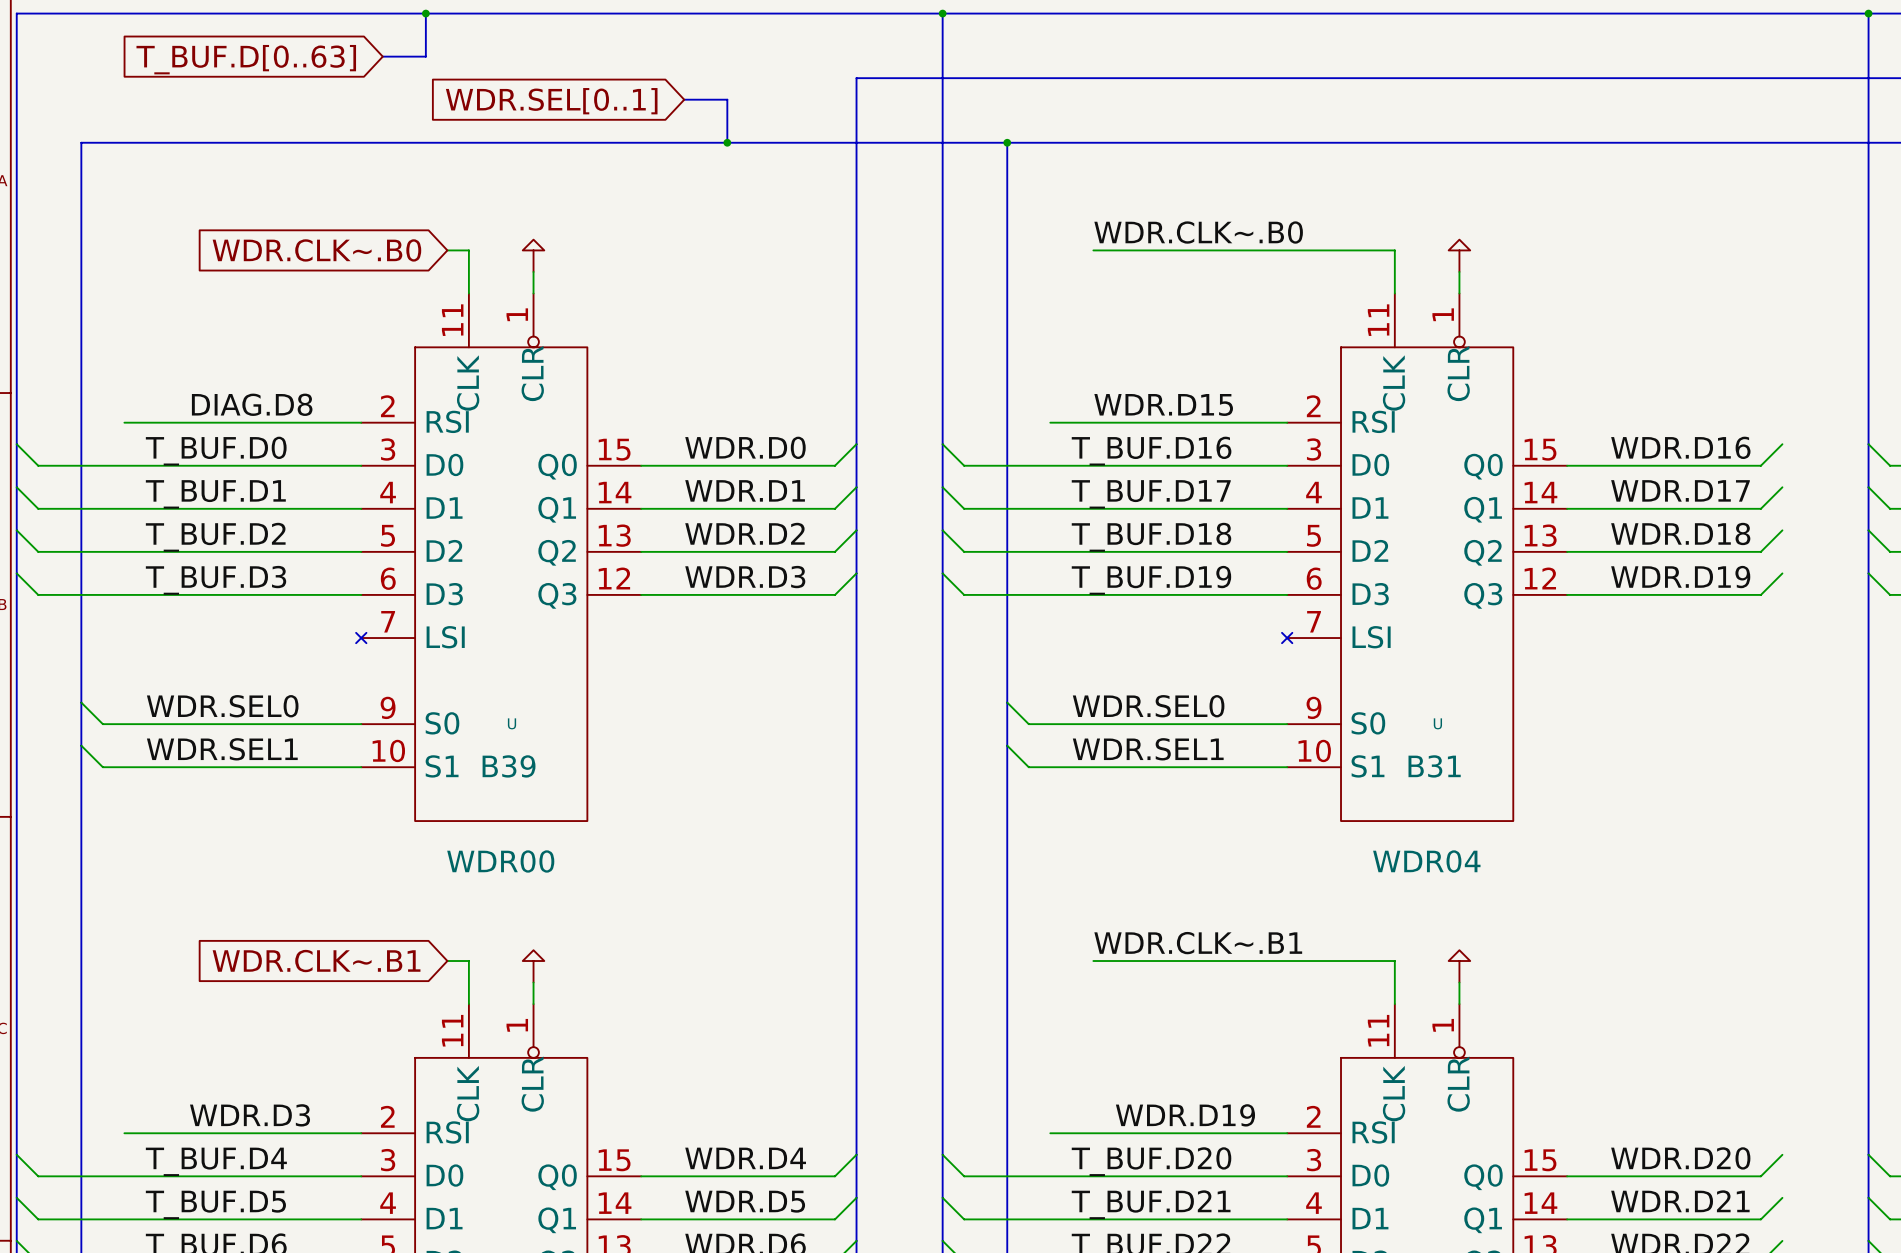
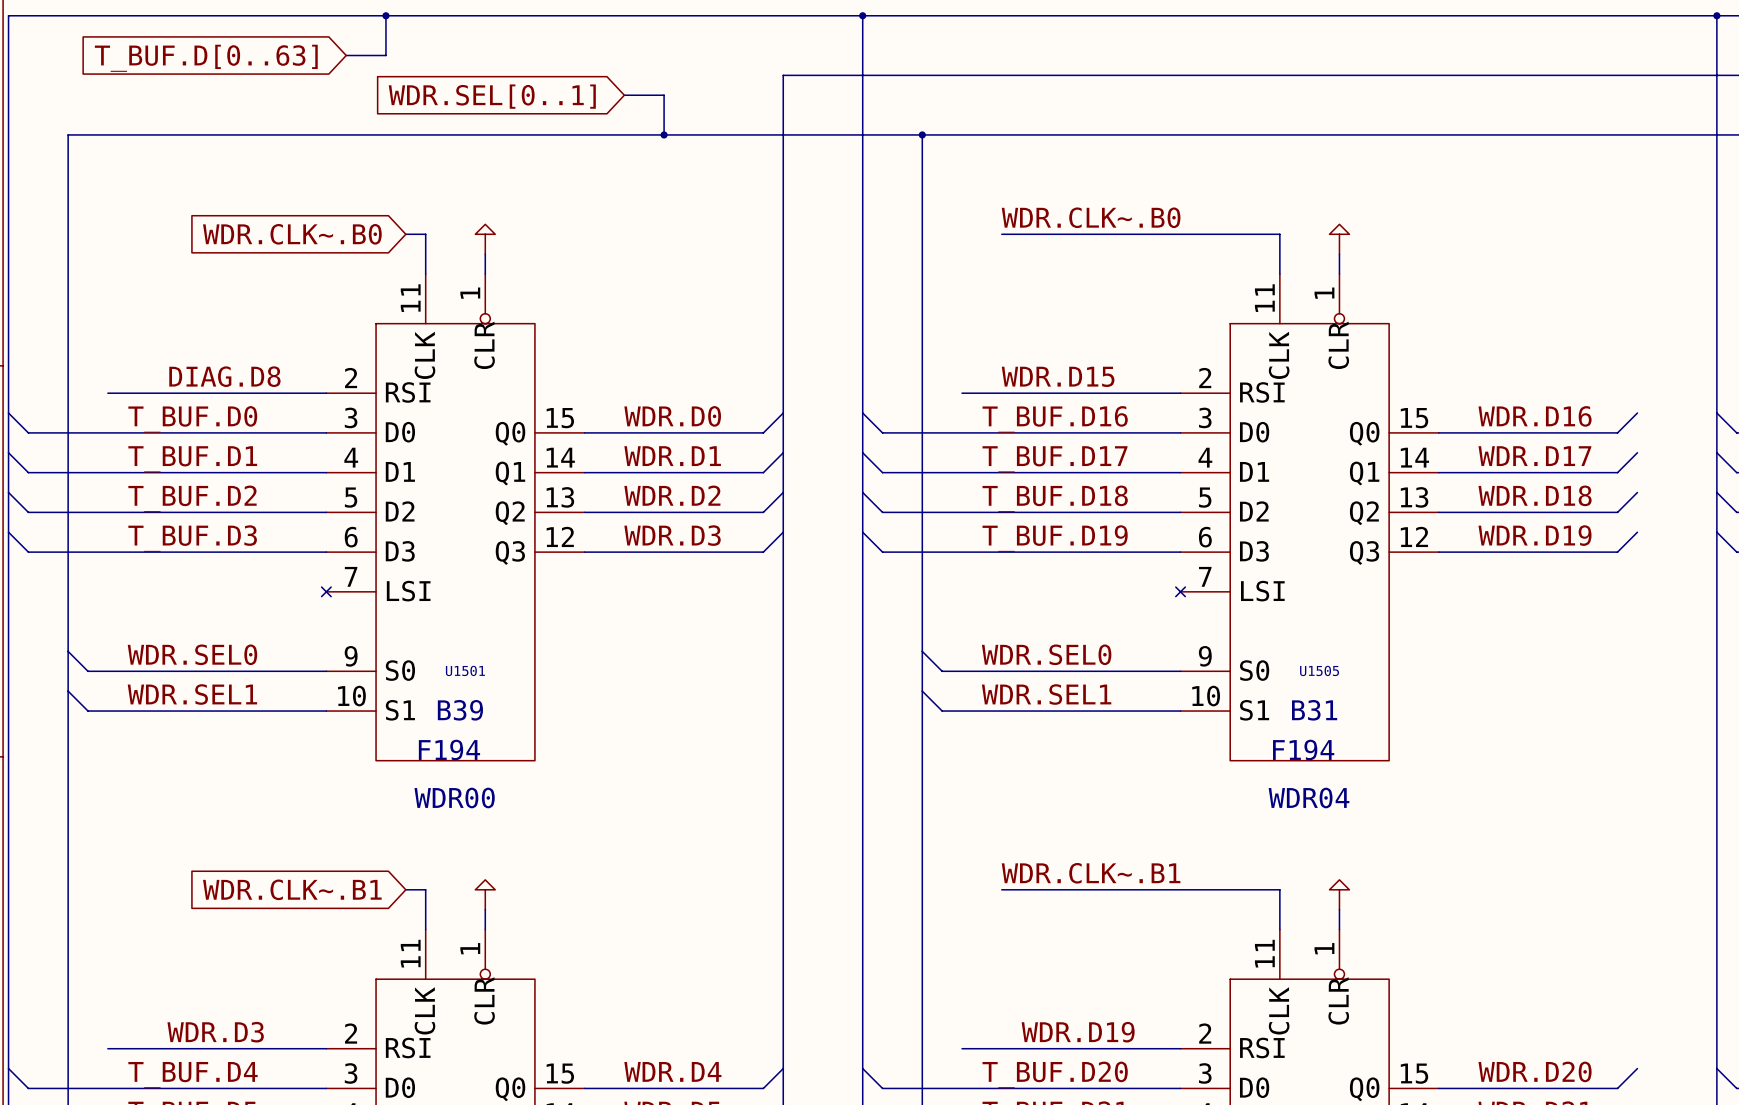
U name: U (512, 723) -> U1501 (465, 670)
U name: U (1437, 723) -> U1505 (1319, 670)
U value: none -> F194 (449, 750)
U value: none -> F194 (1303, 750)

